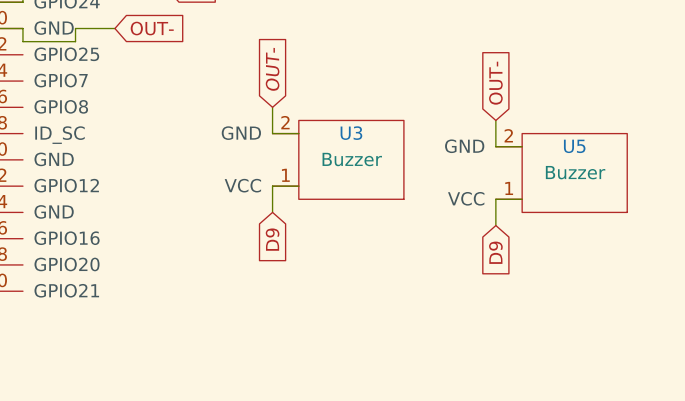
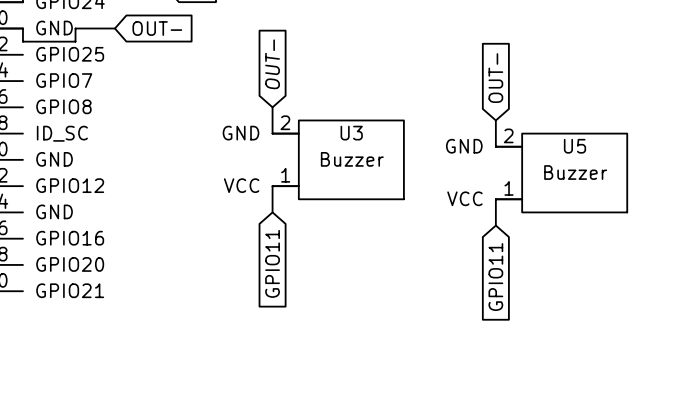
global label: D9 (272, 239) -> GPIO11 (272, 263)
global label: D9 (495, 252) -> GPIO11 (495, 277)

